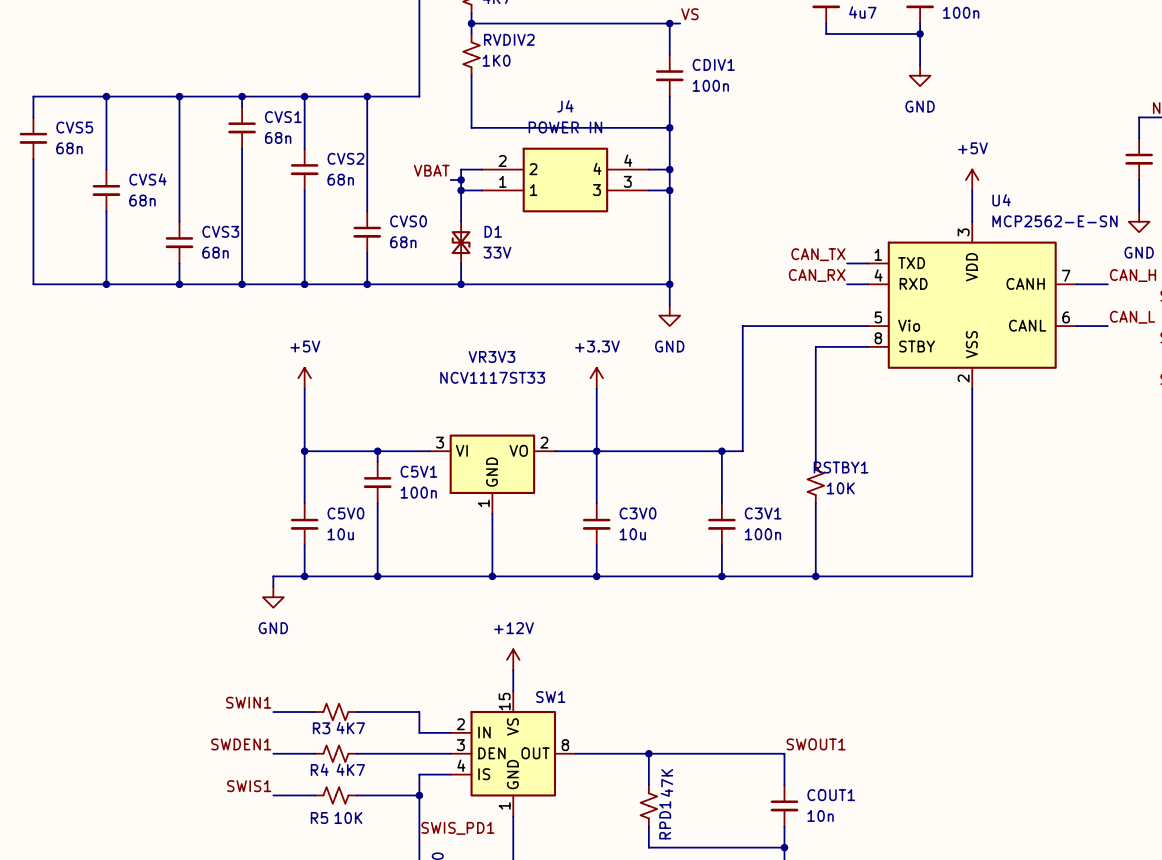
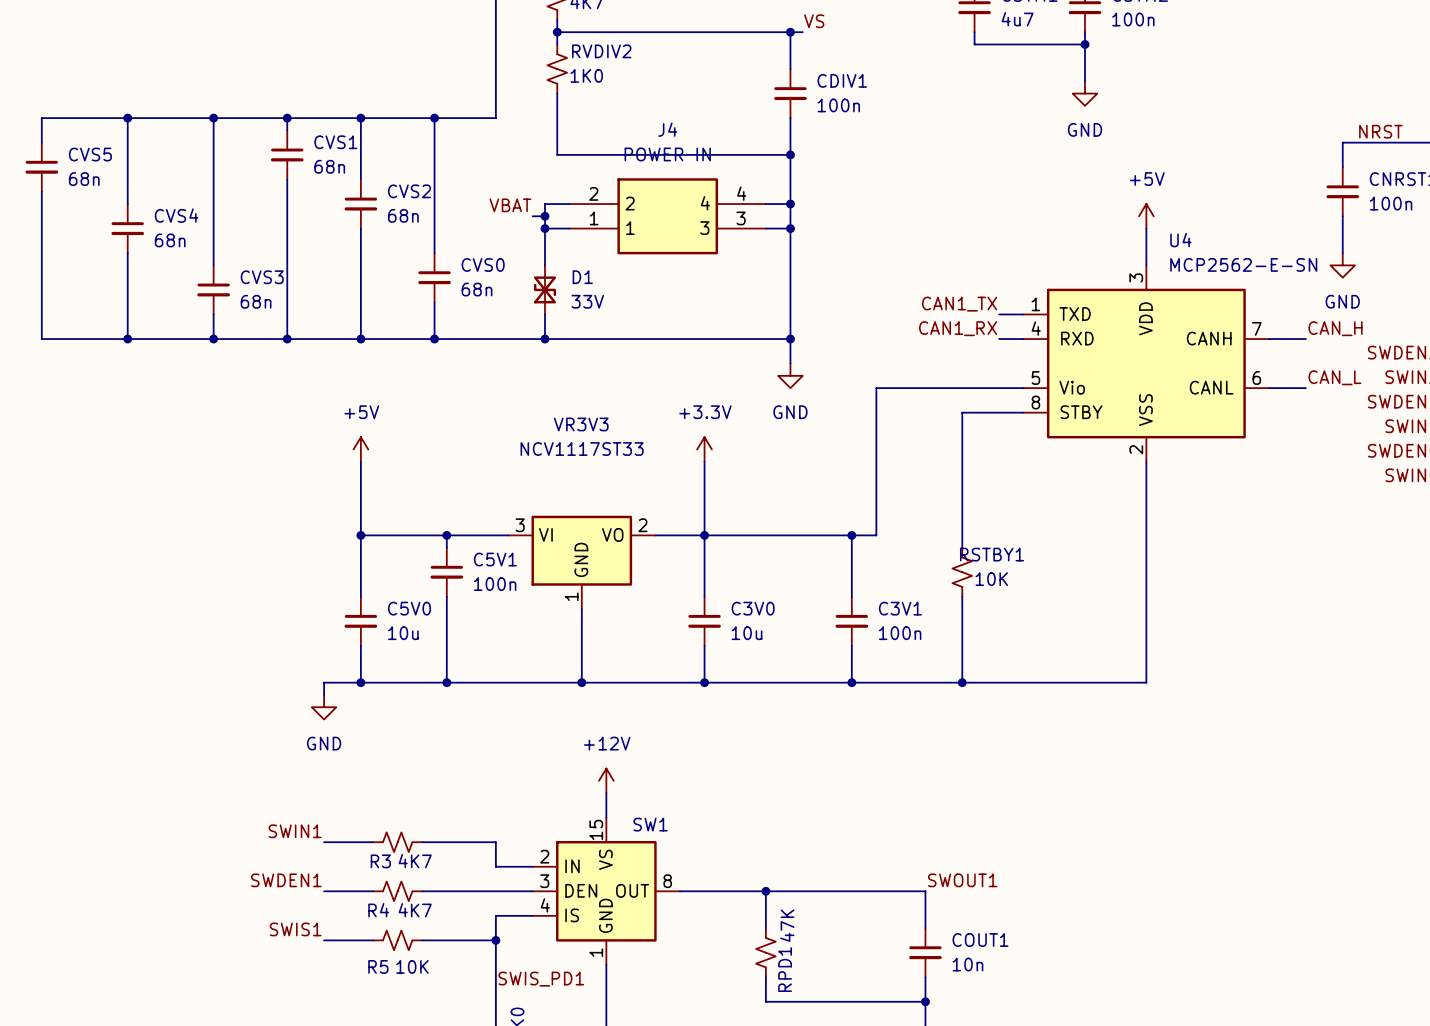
label: CAN_TX (818, 254) -> CAN1_TX (959, 304)
label: CAN_RX (817, 275) -> CAN1_RX (958, 328)

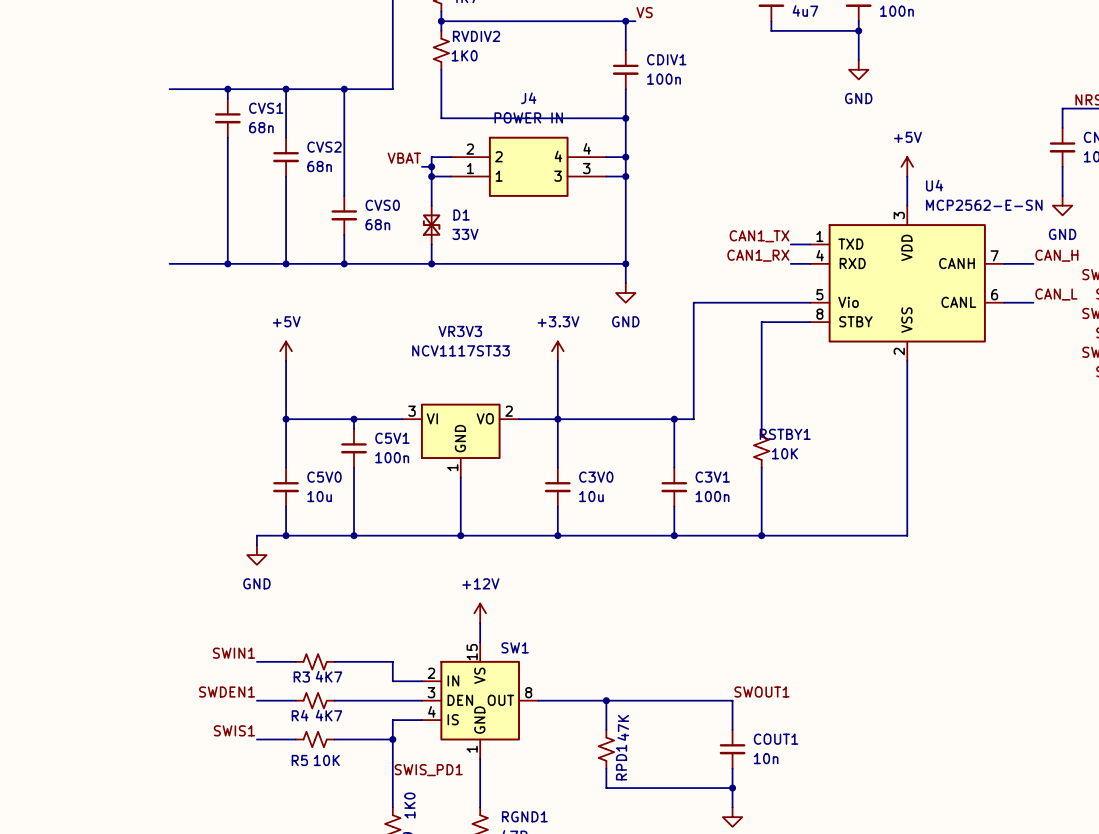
wire: (127, 118) (127, 204) -> none
junction: (127, 118) -> none
junction: (213, 118) -> none
wire: (41, 142) (41, 118) (213, 118) (213, 265) -> none
CVS5: 68n (41, 167) -> none
wire: (41, 191) (41, 339) (213, 339) (213, 314) -> none
CVS4: 68n (127, 228) -> none
wire: (127, 253) (127, 339) -> none
CVS3: 68n (213, 289) -> none
junction: (127, 339) -> none
junction: (213, 339) -> none

